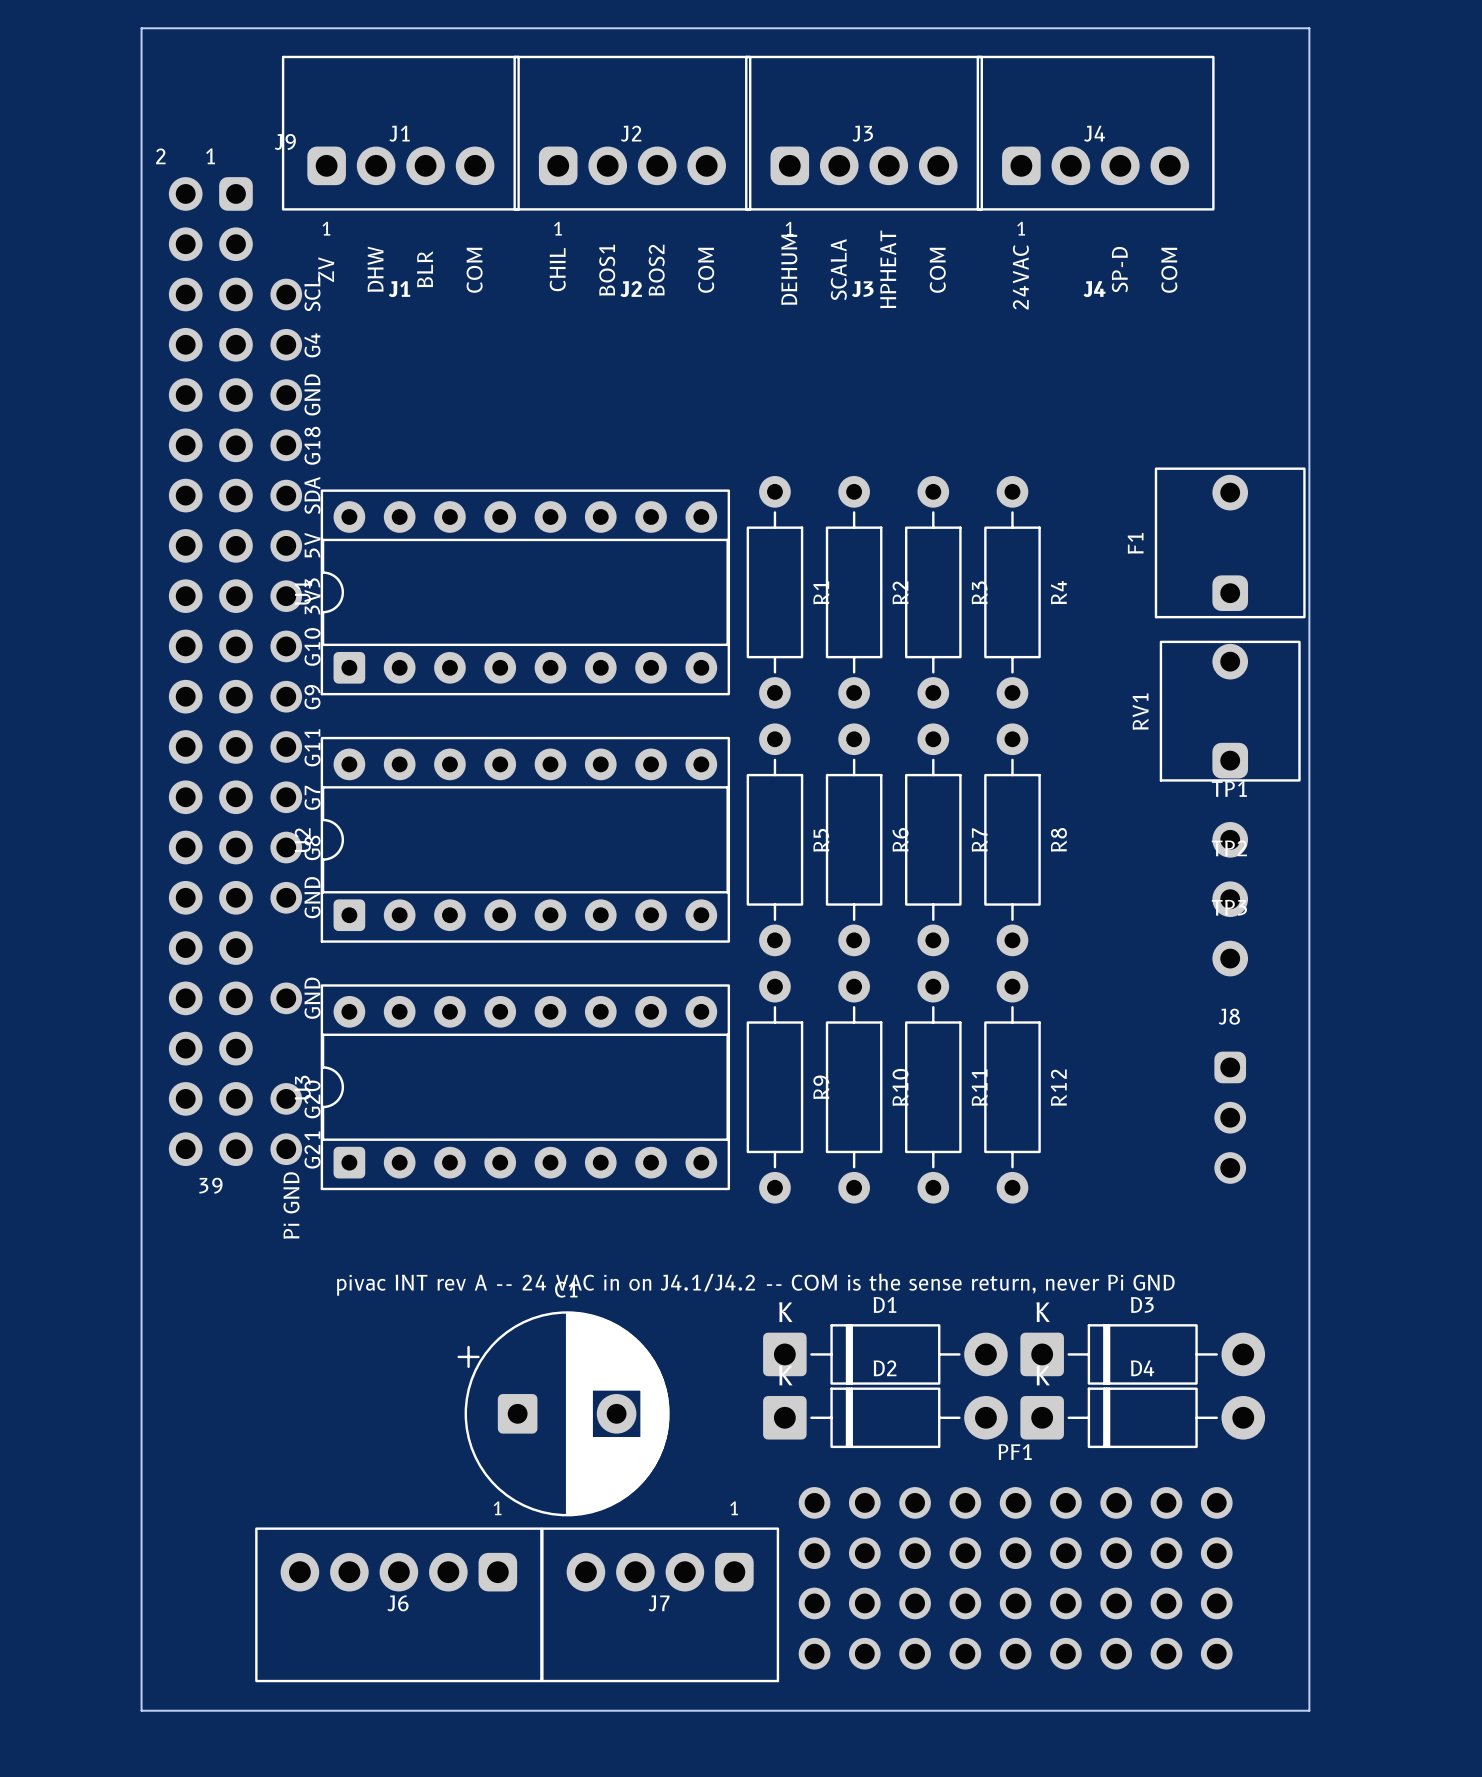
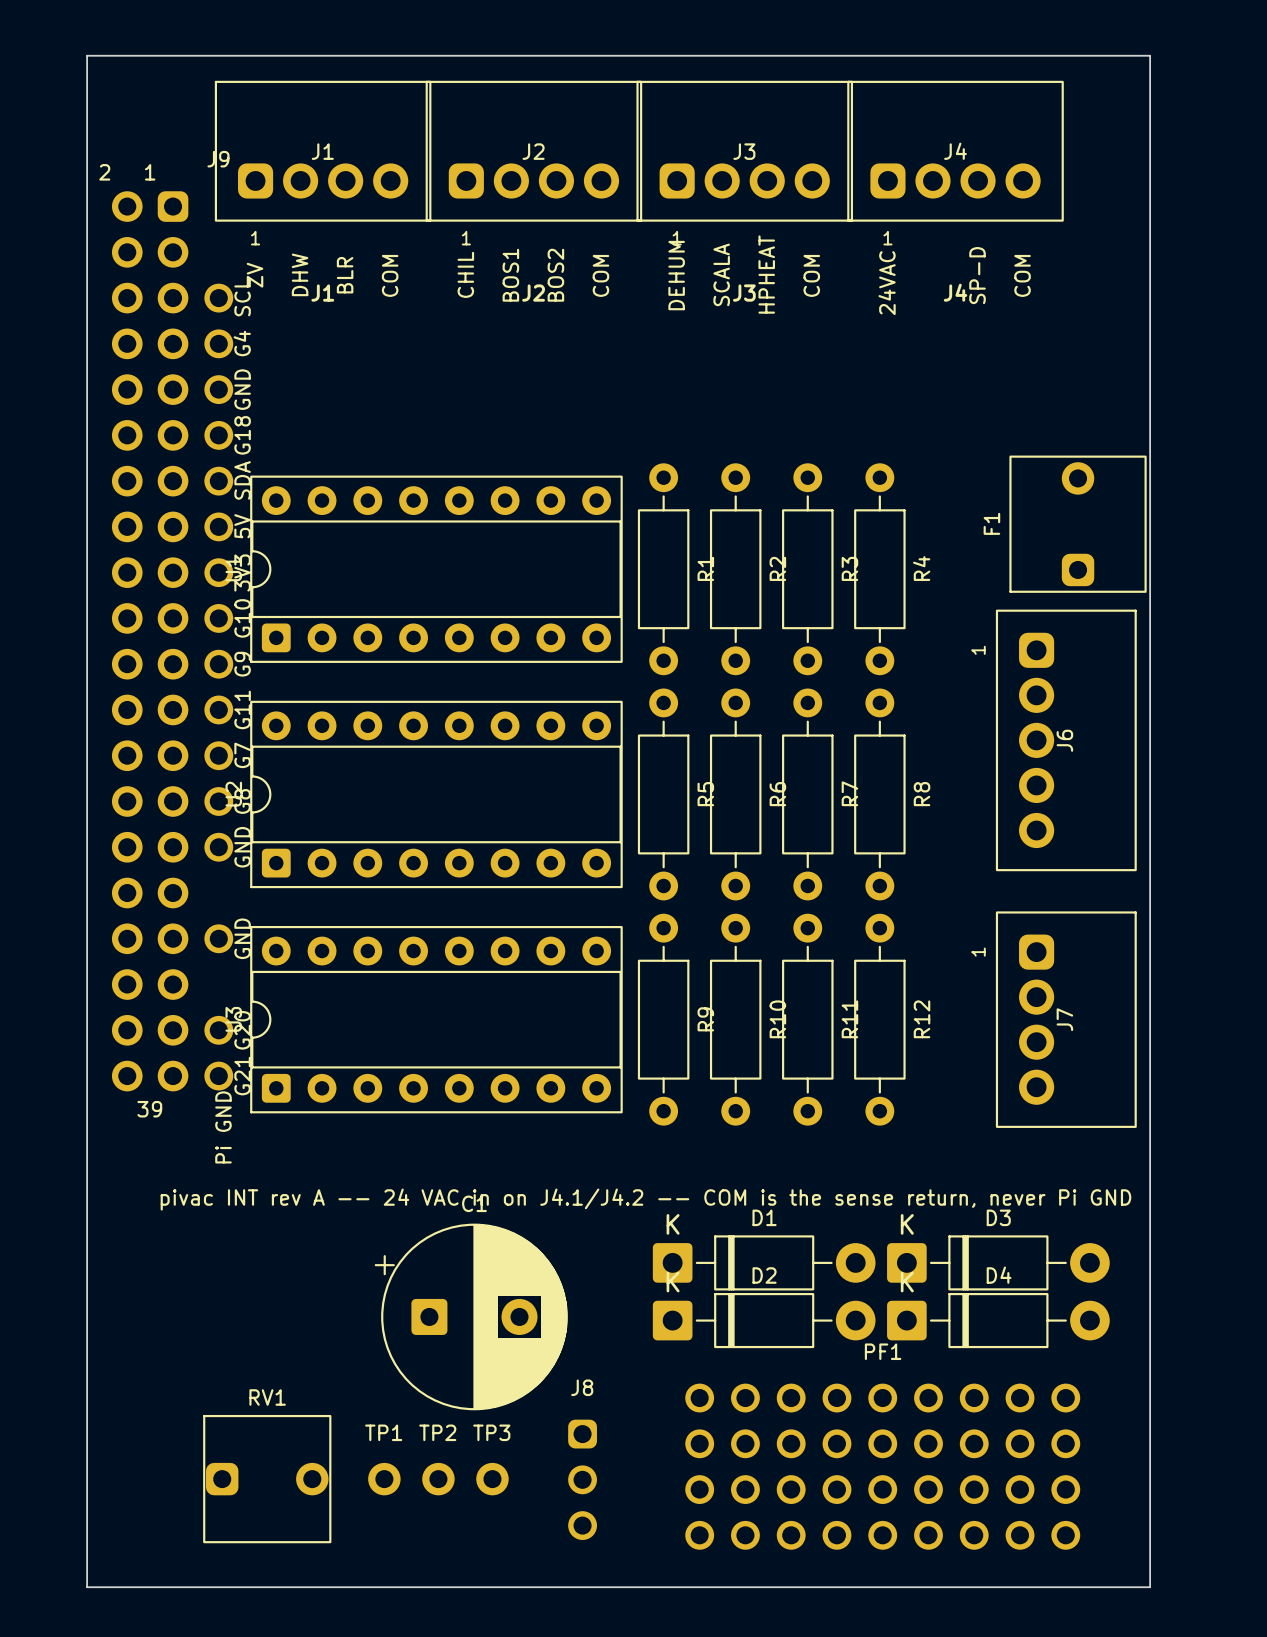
RV1 rotation: 0° (1230, 711) -> 90° clockwise (267, 1479)
RV1 position: (1230, 711) -> (267, 1479)
TP1 position: (1230, 839) -> (384, 1479)
TP2 position: (1230, 899) -> (438, 1479)
TP3 position: (1230, 958) -> (492, 1479)
J8 position: (1230, 1117) -> (582, 1479)
J6 rotation: 0° (398, 1604) -> 90° counterclockwise (1066, 740)
J6 position: (398, 1604) -> (1066, 740)
J7 rotation: 0° (660, 1604) -> 90° counterclockwise (1066, 1019)
J7 position: (660, 1604) -> (1066, 1019)

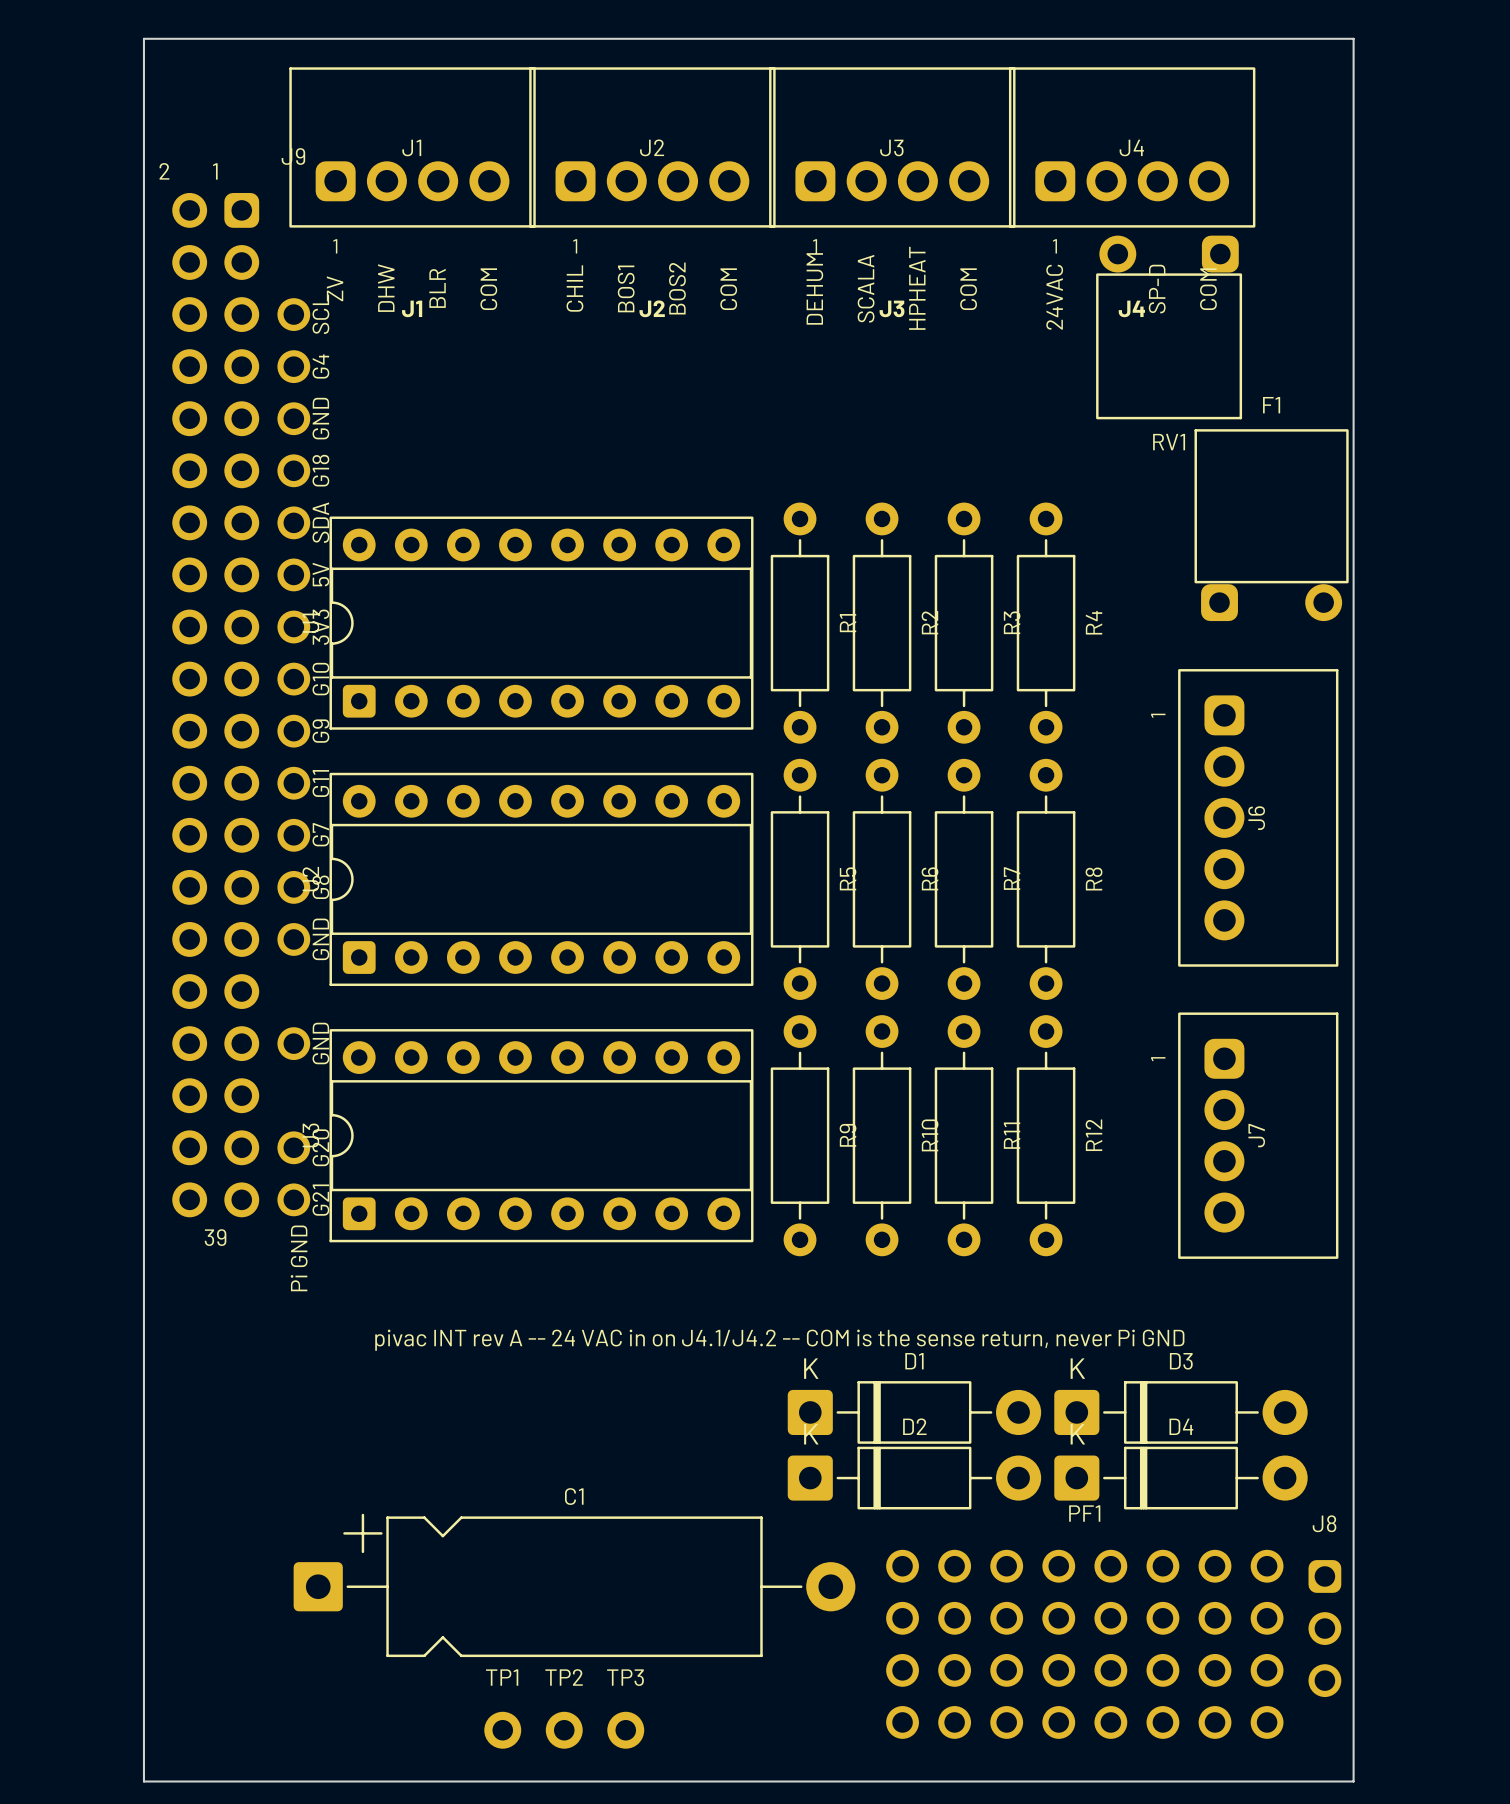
F1 footprint: [1009, 455, 1147, 593] -> [1194, 429, 1349, 622]
F1 name position: F1 (991, 523) -> F1 (1271, 405)
C1 footprint: [374, 1223, 568, 1411] -> [293, 1513, 856, 1658]
PF1 footprint: [685, 1383, 1081, 1550] -> [886, 1549, 1284, 1739]
RV1 name position: RV1 (267, 1397) -> RV1 (1169, 442)
RV1 footprint: [203, 1414, 332, 1544] -> [1096, 235, 1243, 420]
TP1 position: (384, 1479) -> (502, 1730)
TP2 position: (438, 1479) -> (564, 1730)
TP3 position: (492, 1479) -> (625, 1730)
J8 position: (582, 1479) -> (1324, 1628)

